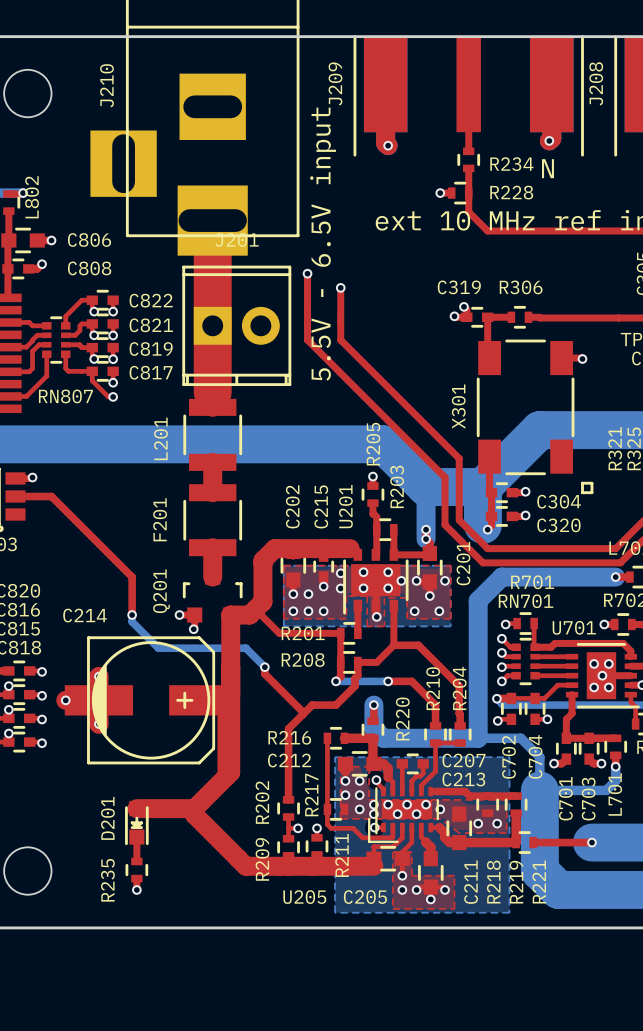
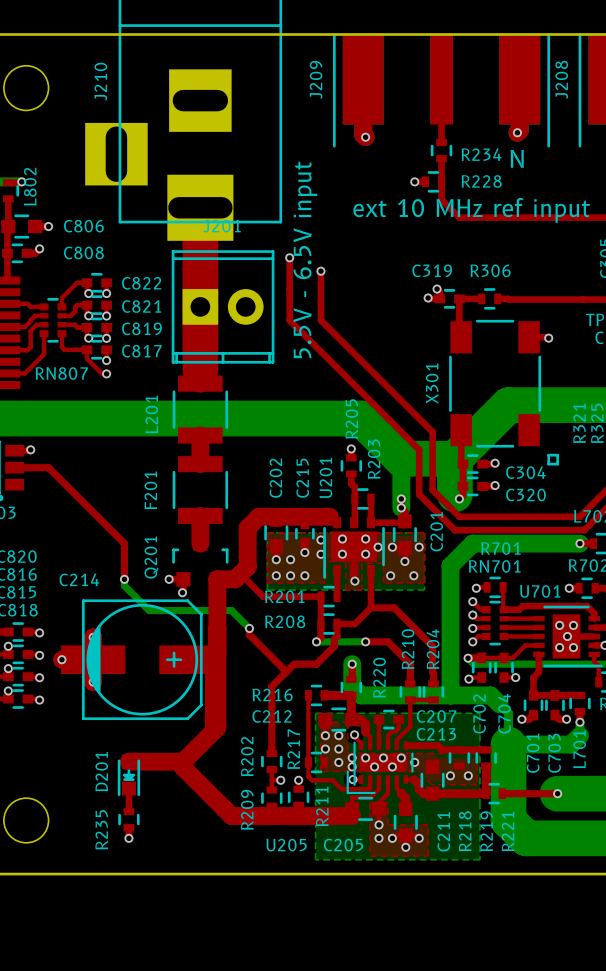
bottom track width: thin (478, 738) (520, 738) (530, 747) -> thick (450, 695) (490, 695) (499, 704)
bottom track width: thin (615, 780) (606, 790) (554, 790) -> thick (579, 735) (571, 744) (521, 744)

